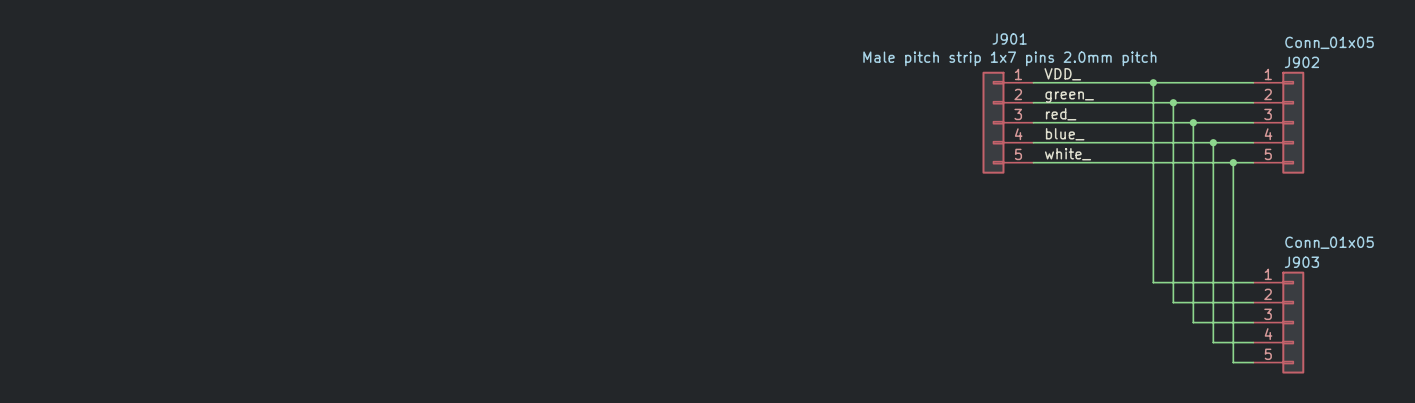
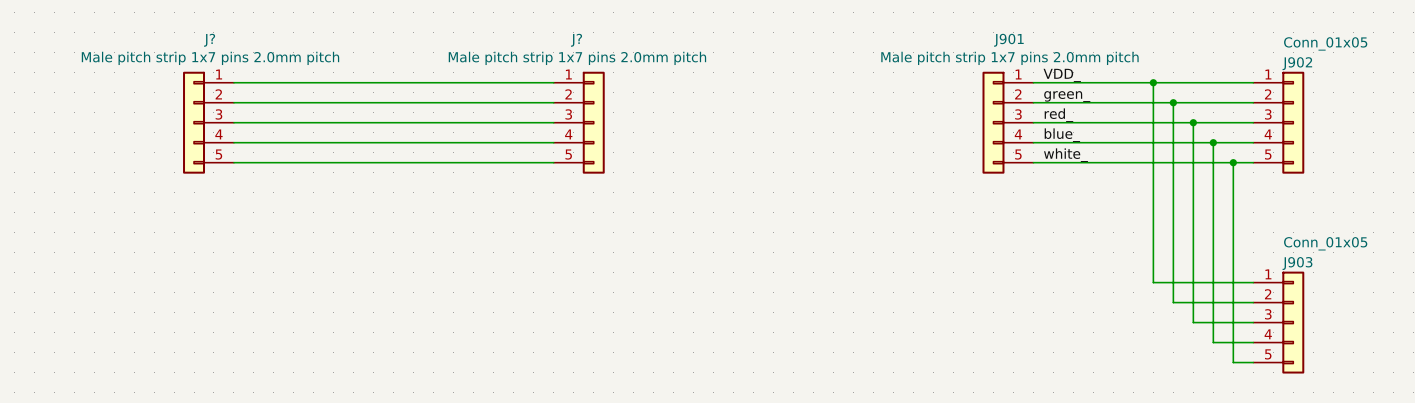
wire: none -> (233, 82) (553, 82)
wire: none -> (233, 102) (553, 102)
J?: none -> Male pitch strip 1x7 pins 2.0mm pitch (208, 122)
wire: none -> (233, 122) (553, 122)
J?: none -> Male pitch strip 1x7 pins 2.0mm pitch (579, 122)
wire: none -> (233, 142) (553, 142)
wire: none -> (233, 162) (553, 162)

